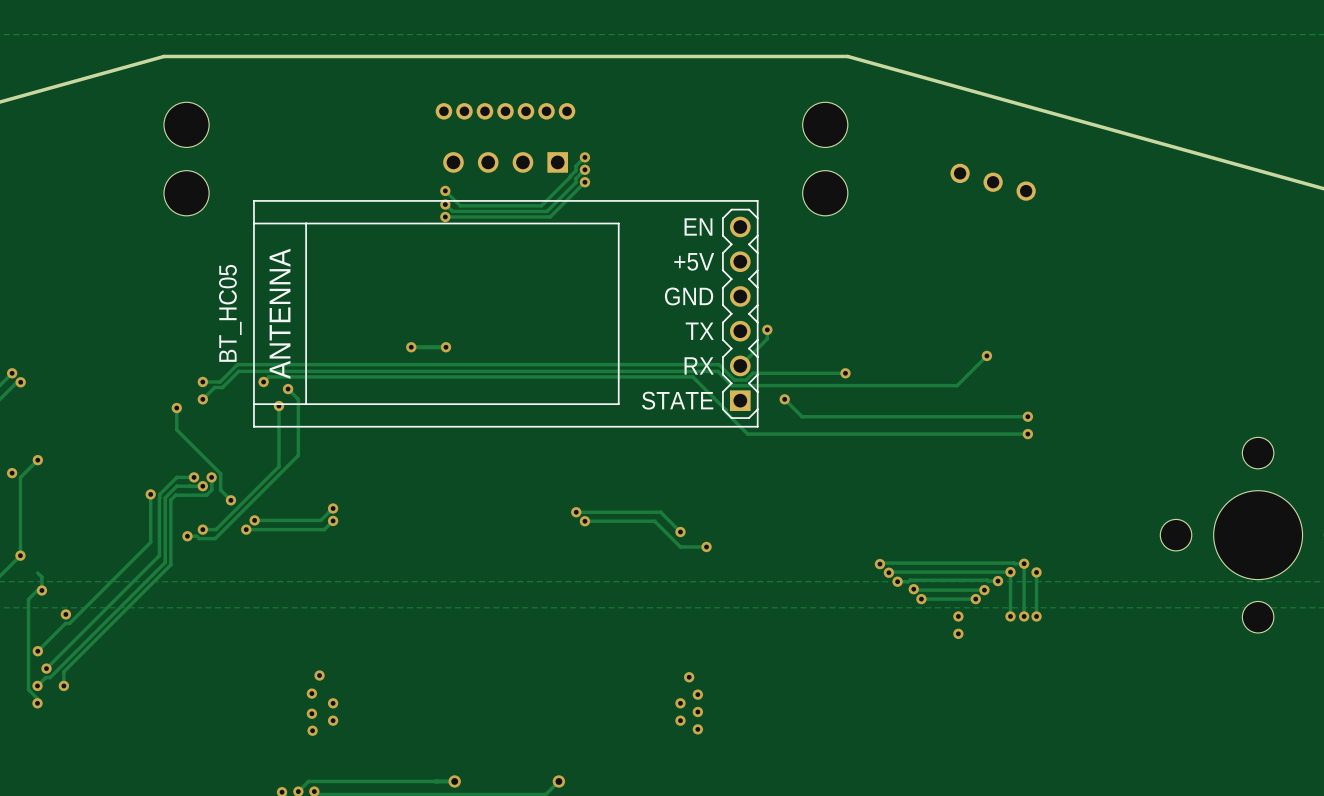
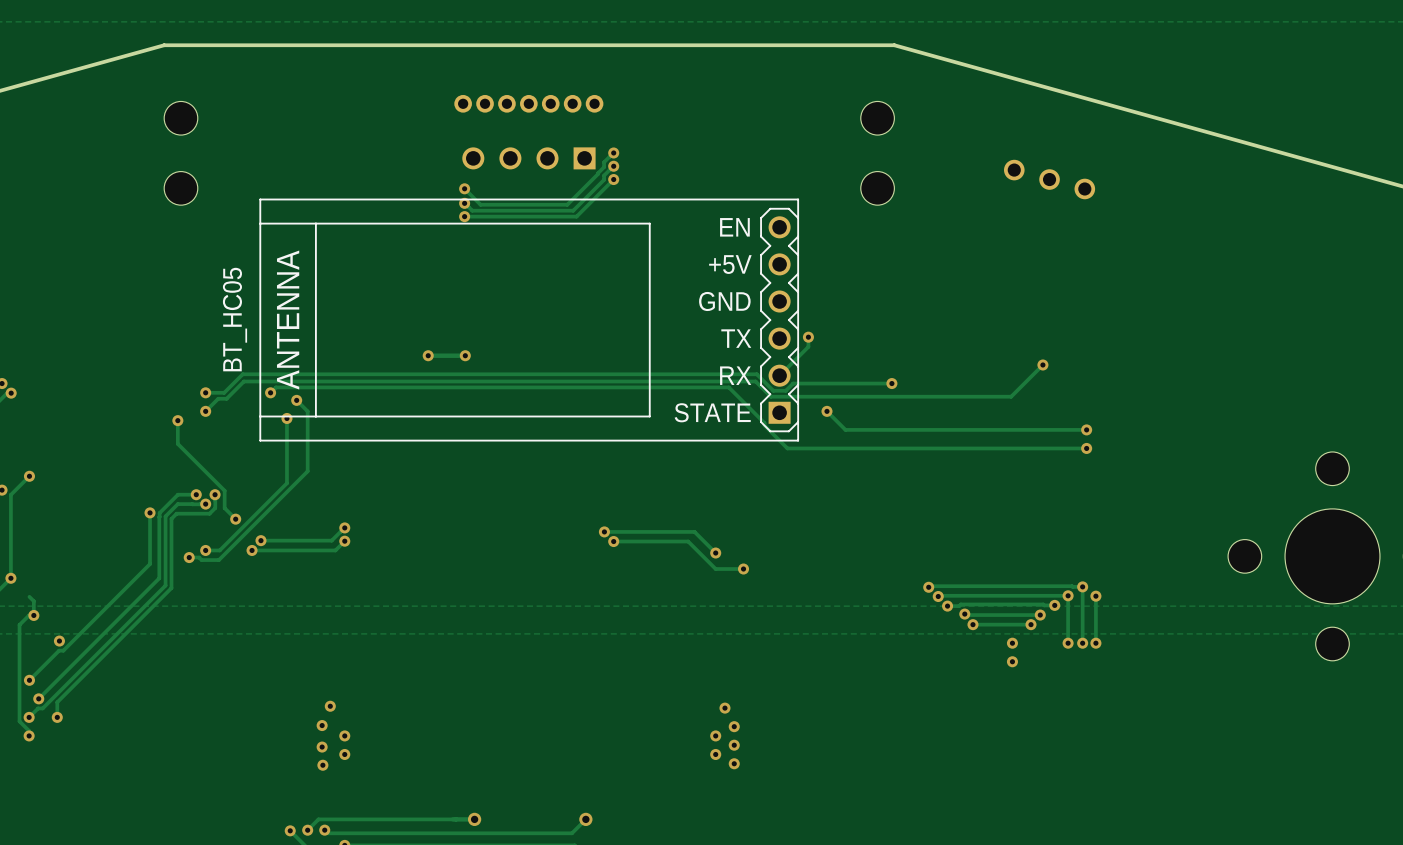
hole size: [163, 102, 210, 148] -> [164, 101, 198, 136]
hole size: [802, 102, 848, 148] -> [860, 101, 895, 136]
hole size: [163, 170, 210, 216] -> [164, 171, 198, 206]
hole size: [802, 170, 848, 216] -> [860, 171, 895, 206]

